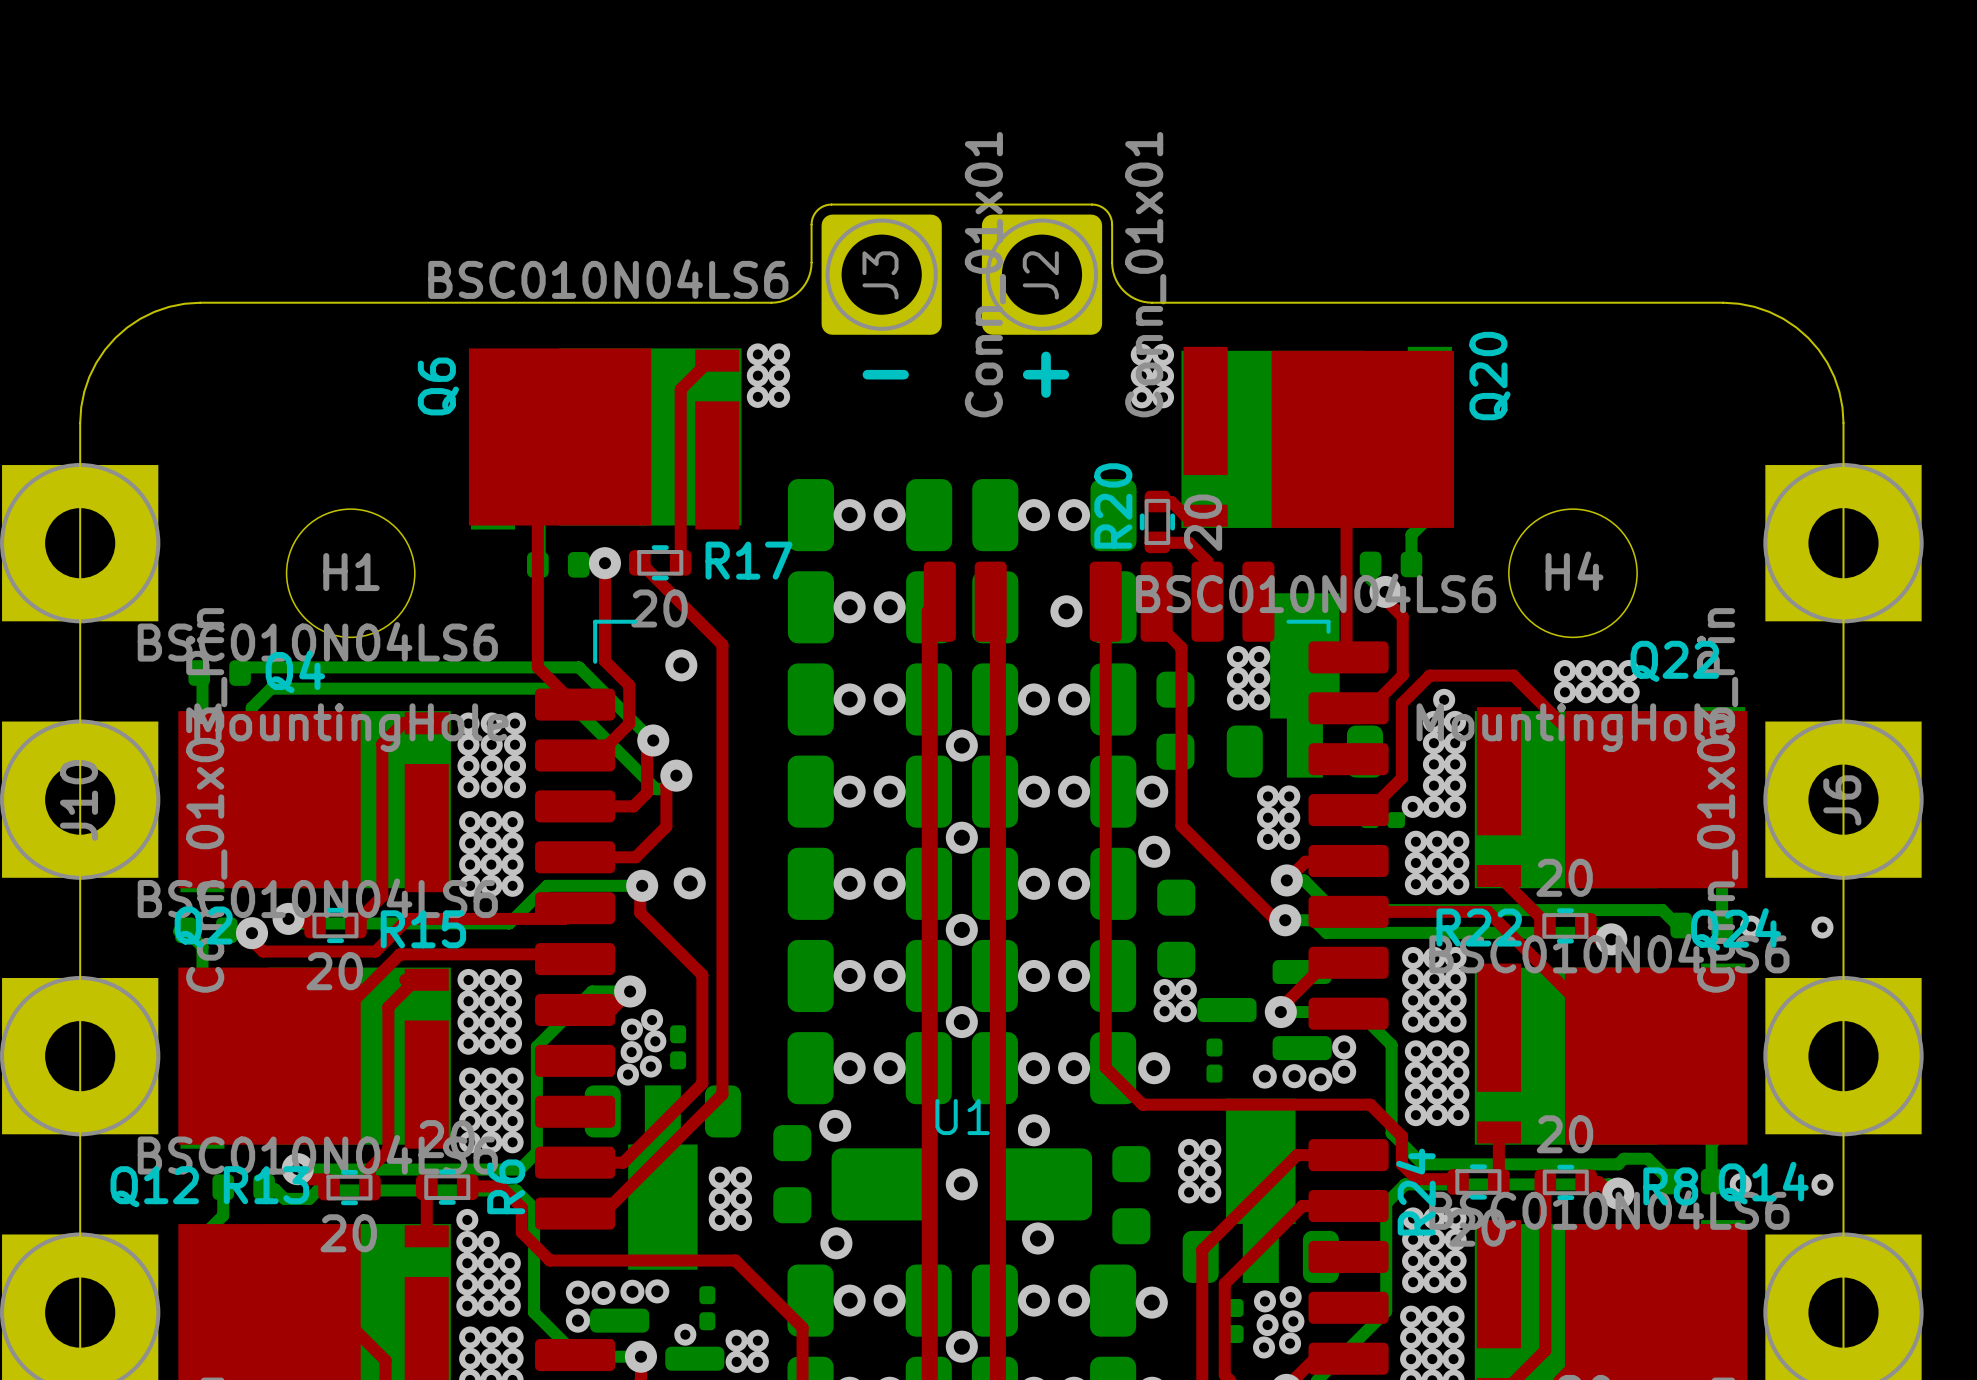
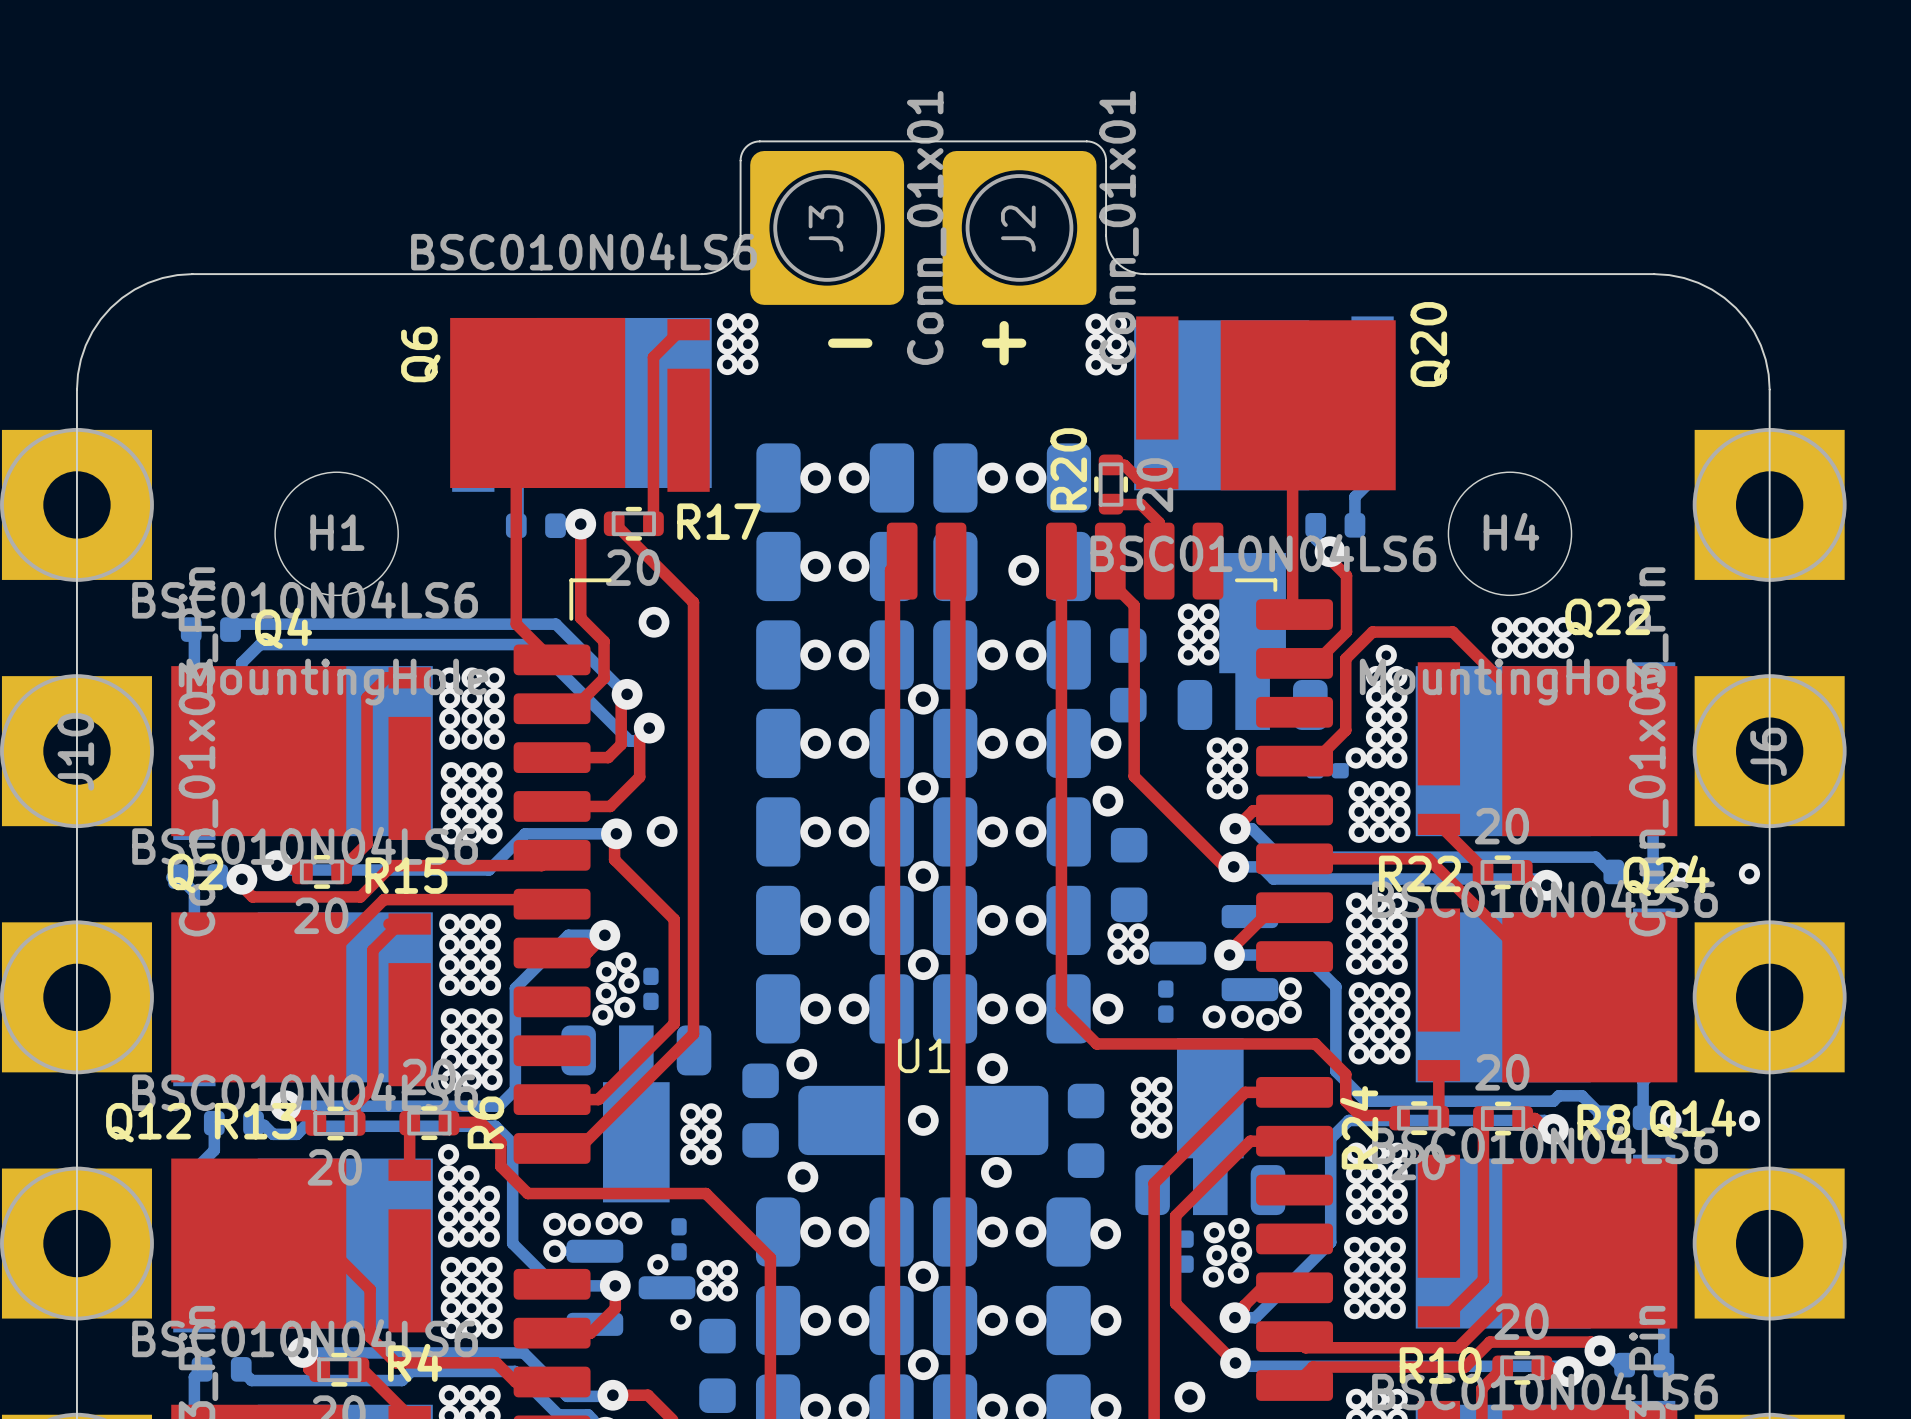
J3 footprint: [821, 214, 942, 335] -> [750, 151, 905, 305]
J2 footprint: [981, 214, 1103, 335] -> [942, 151, 1097, 305]
board edge: (731, 302) (780, 301) (792, 296) (799, 290) (805, 283) (810, 271) (813, 216) (819, 208) (831, 204) (1097, 205) (1106, 210) (1111, 219) (1113, 271) (1116, 280) (1123, 290) (1130, 296) (1143, 301) (1192, 302) -> (702, 274) (722, 268) (736, 252) (740, 235) (741, 155) (748, 145) (759, 141) (1094, 142) (1102, 148) (1105, 158) (1106, 235) (1108, 248) (1114, 259) (1124, 268) (1144, 274)

